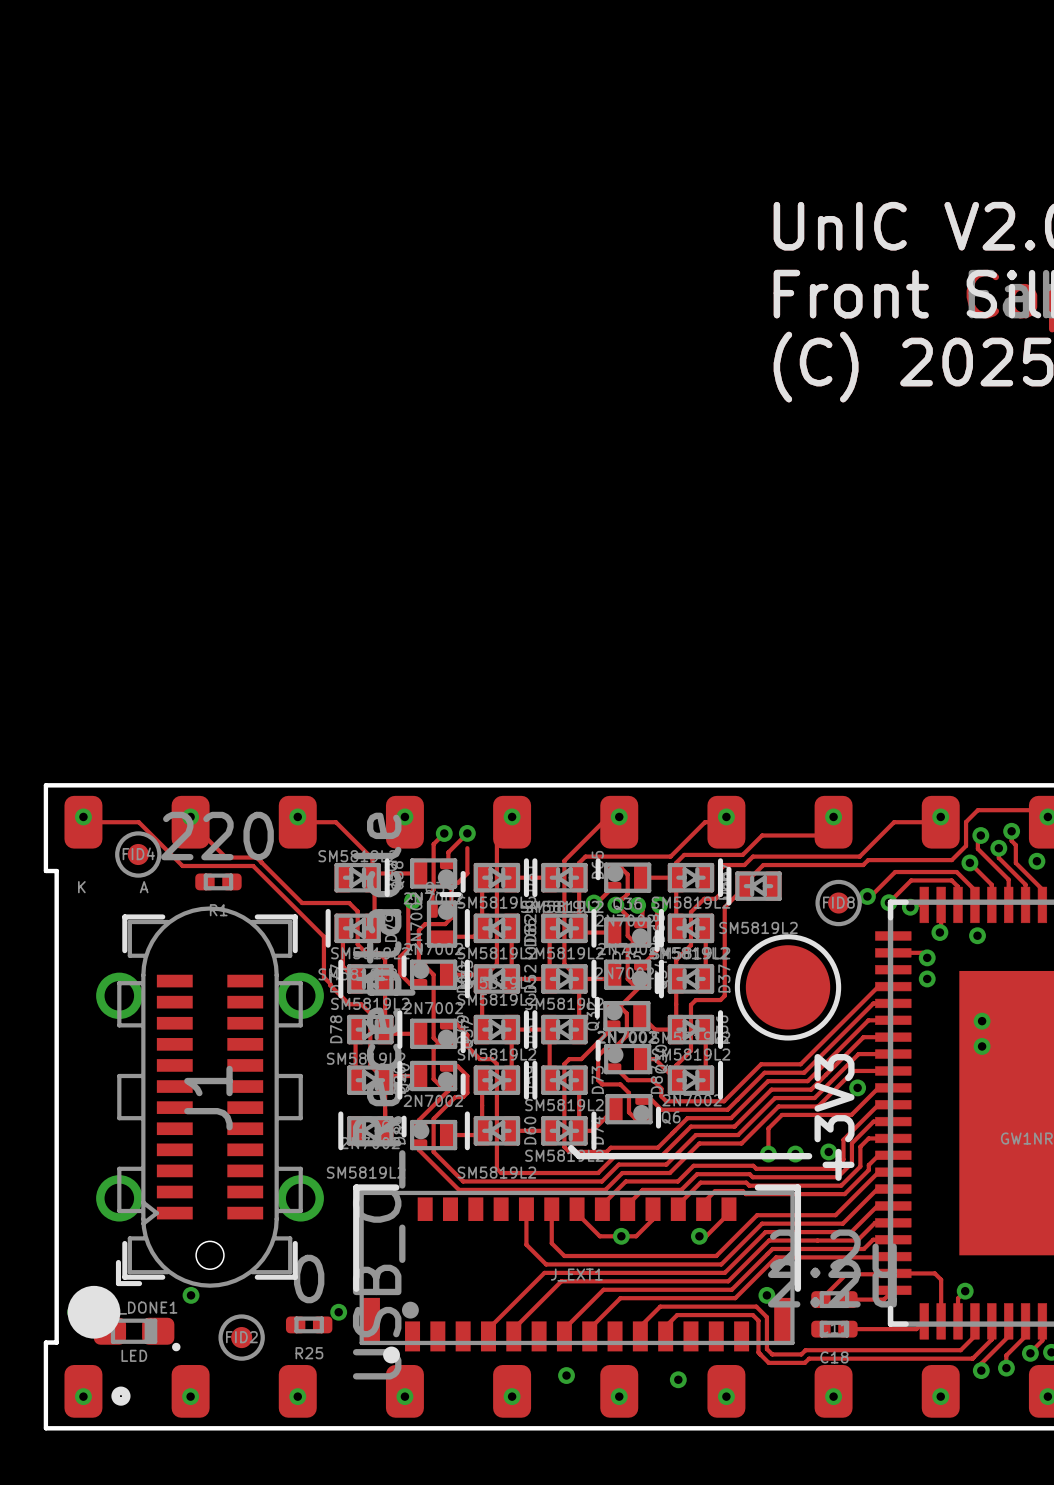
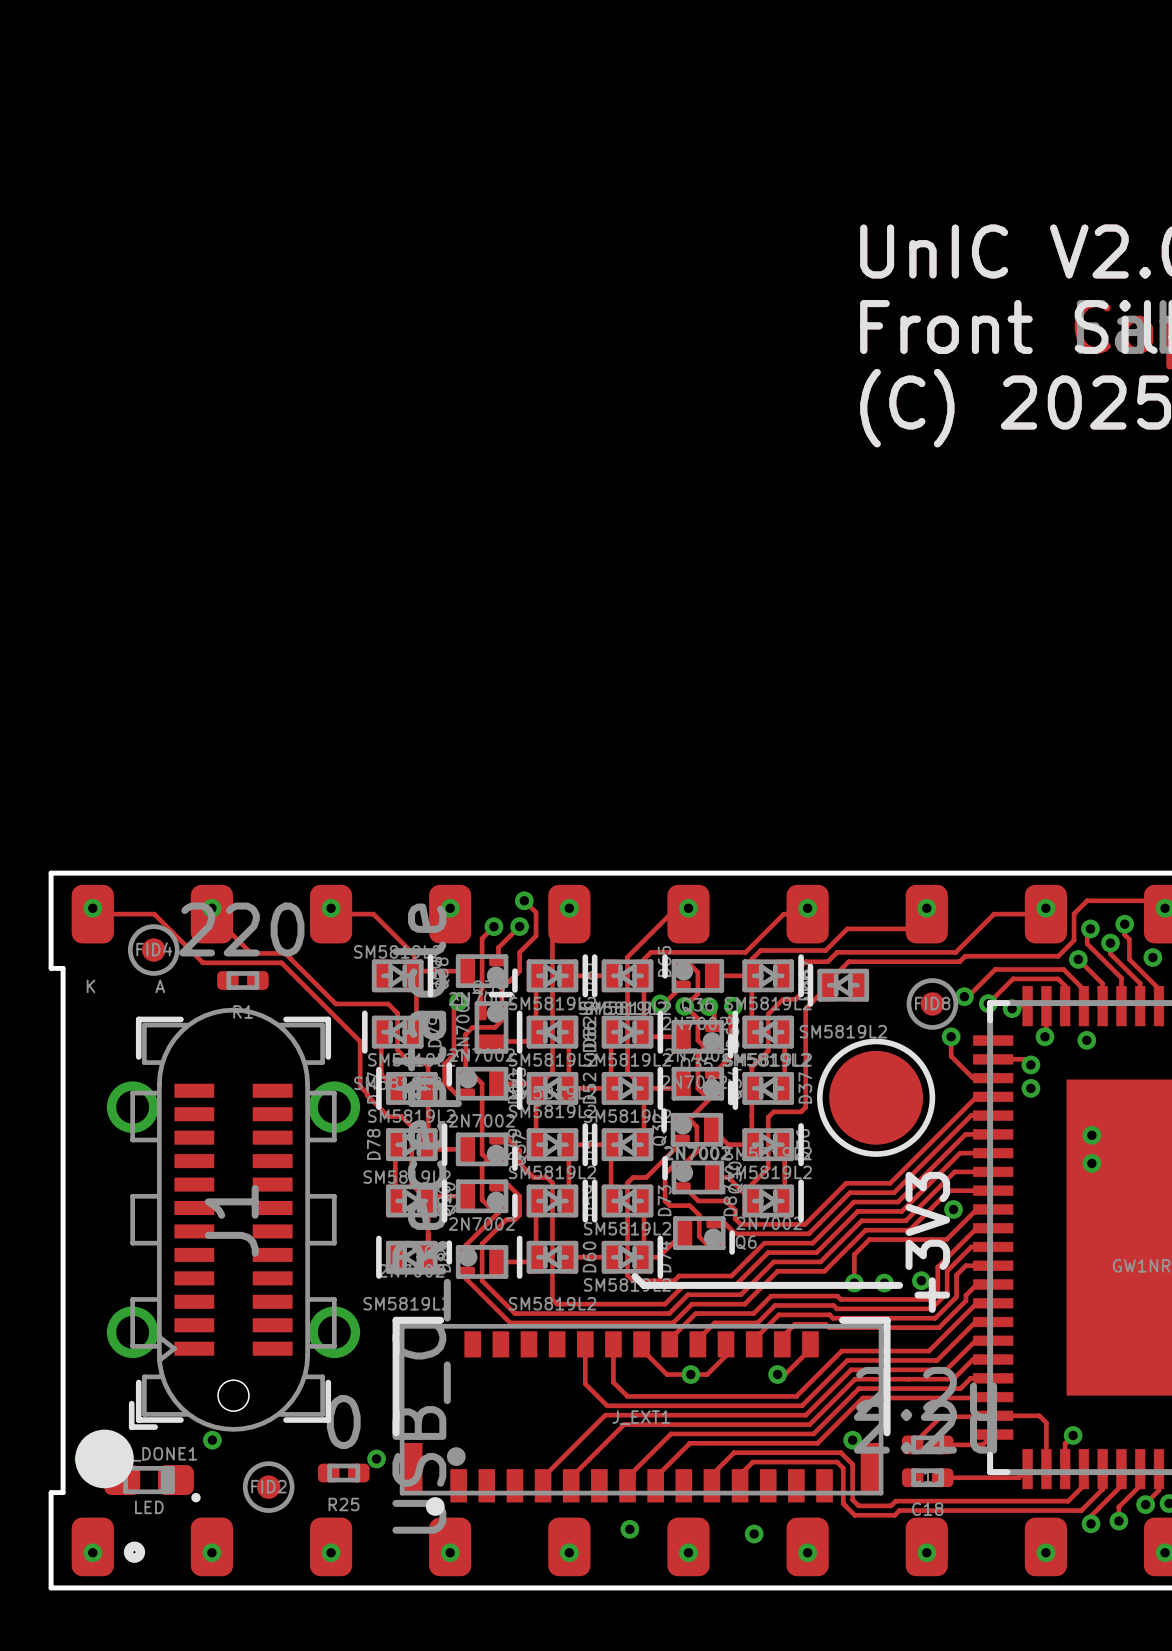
via: none -> (524, 900)
track: (467, 848) (467, 856) -> (524, 900) (536, 912) (536, 935) (519, 952)
track: none -> (951, 1036) (951, 1056) (972, 1078) (993, 1078)
via: none -> (951, 1036)

